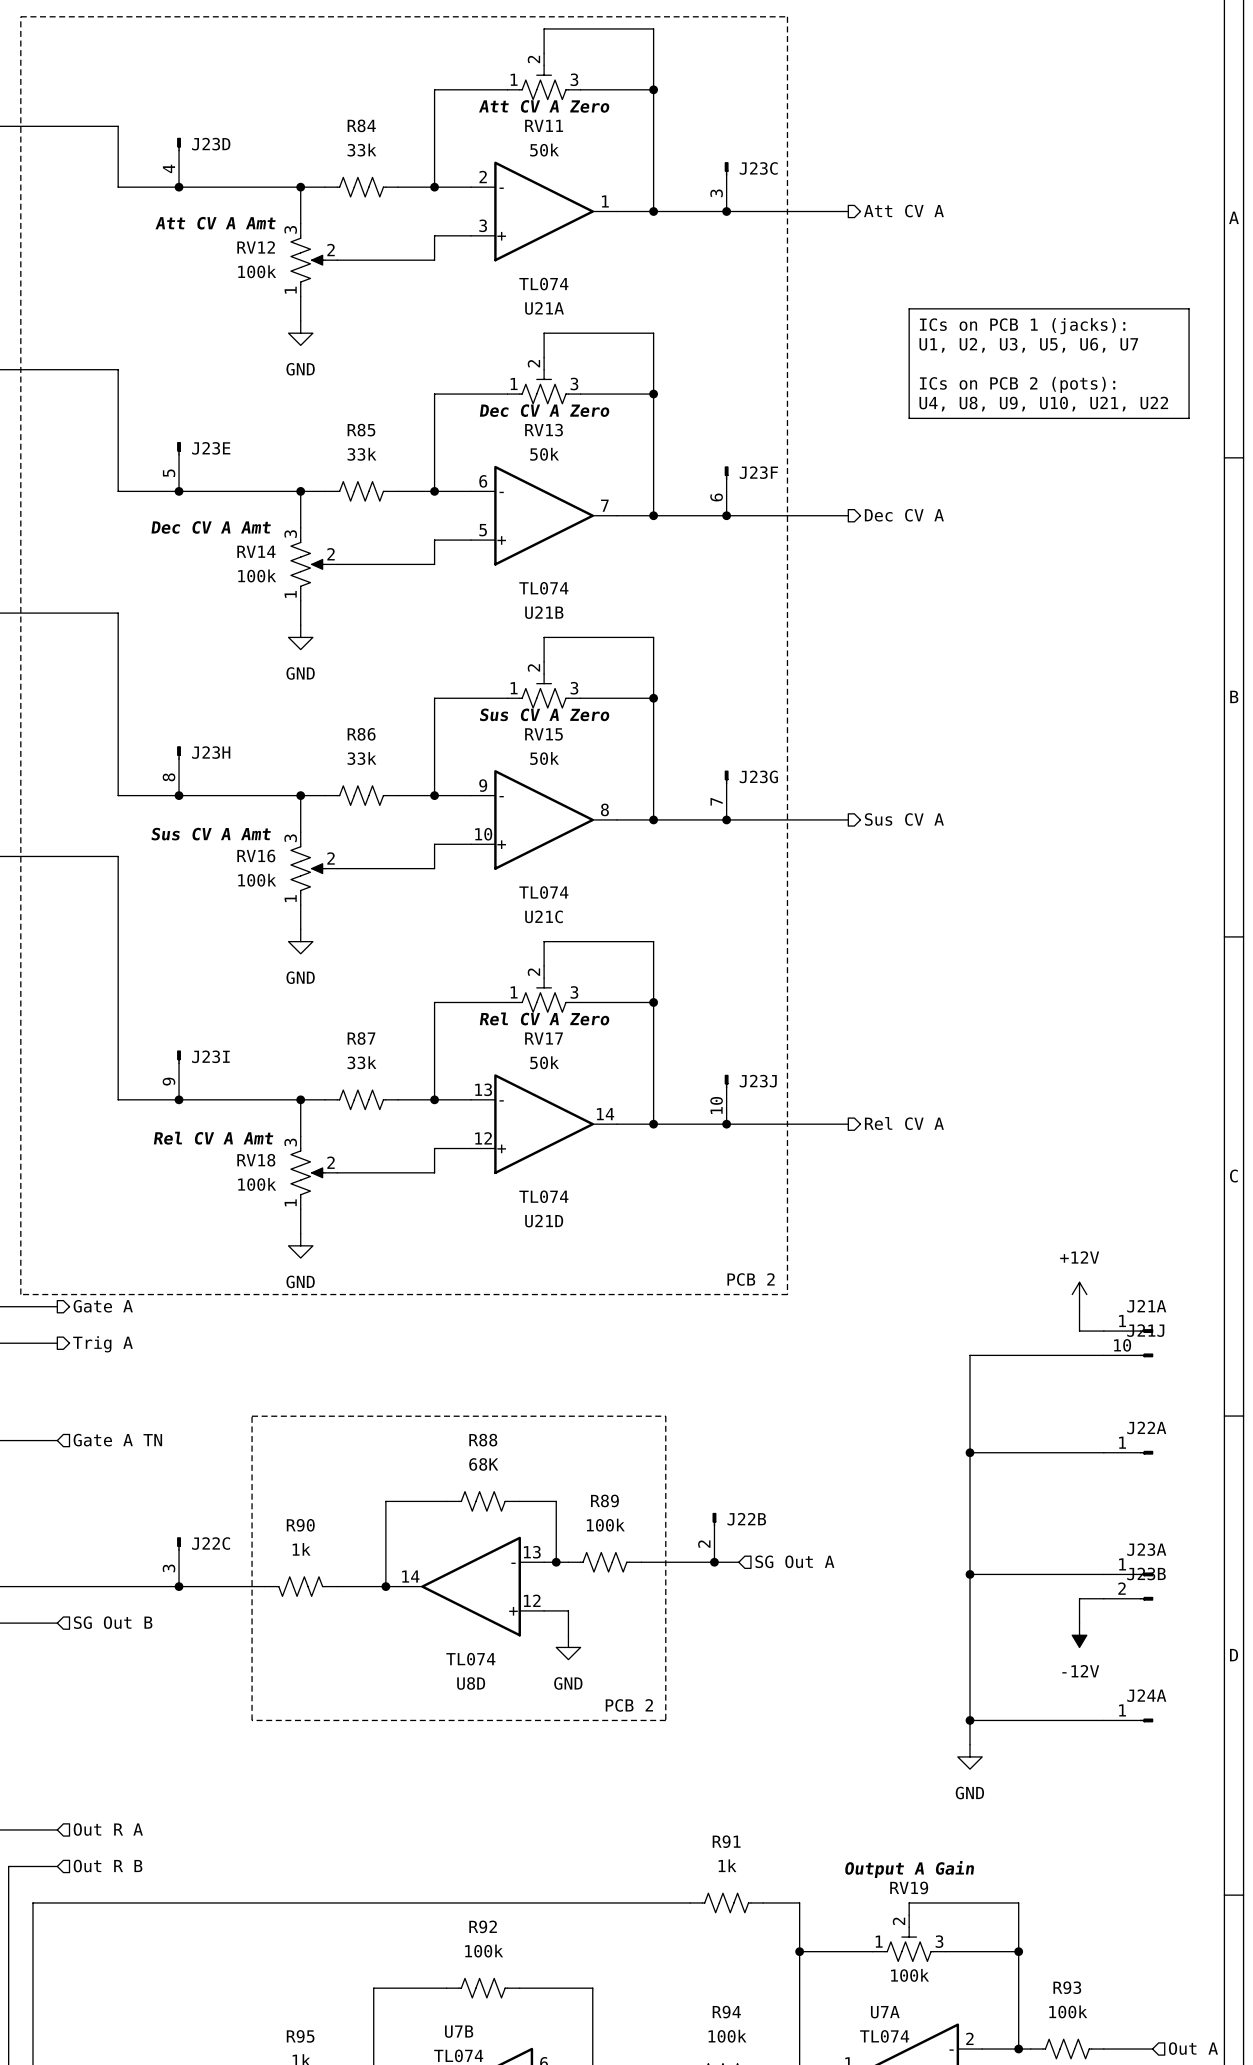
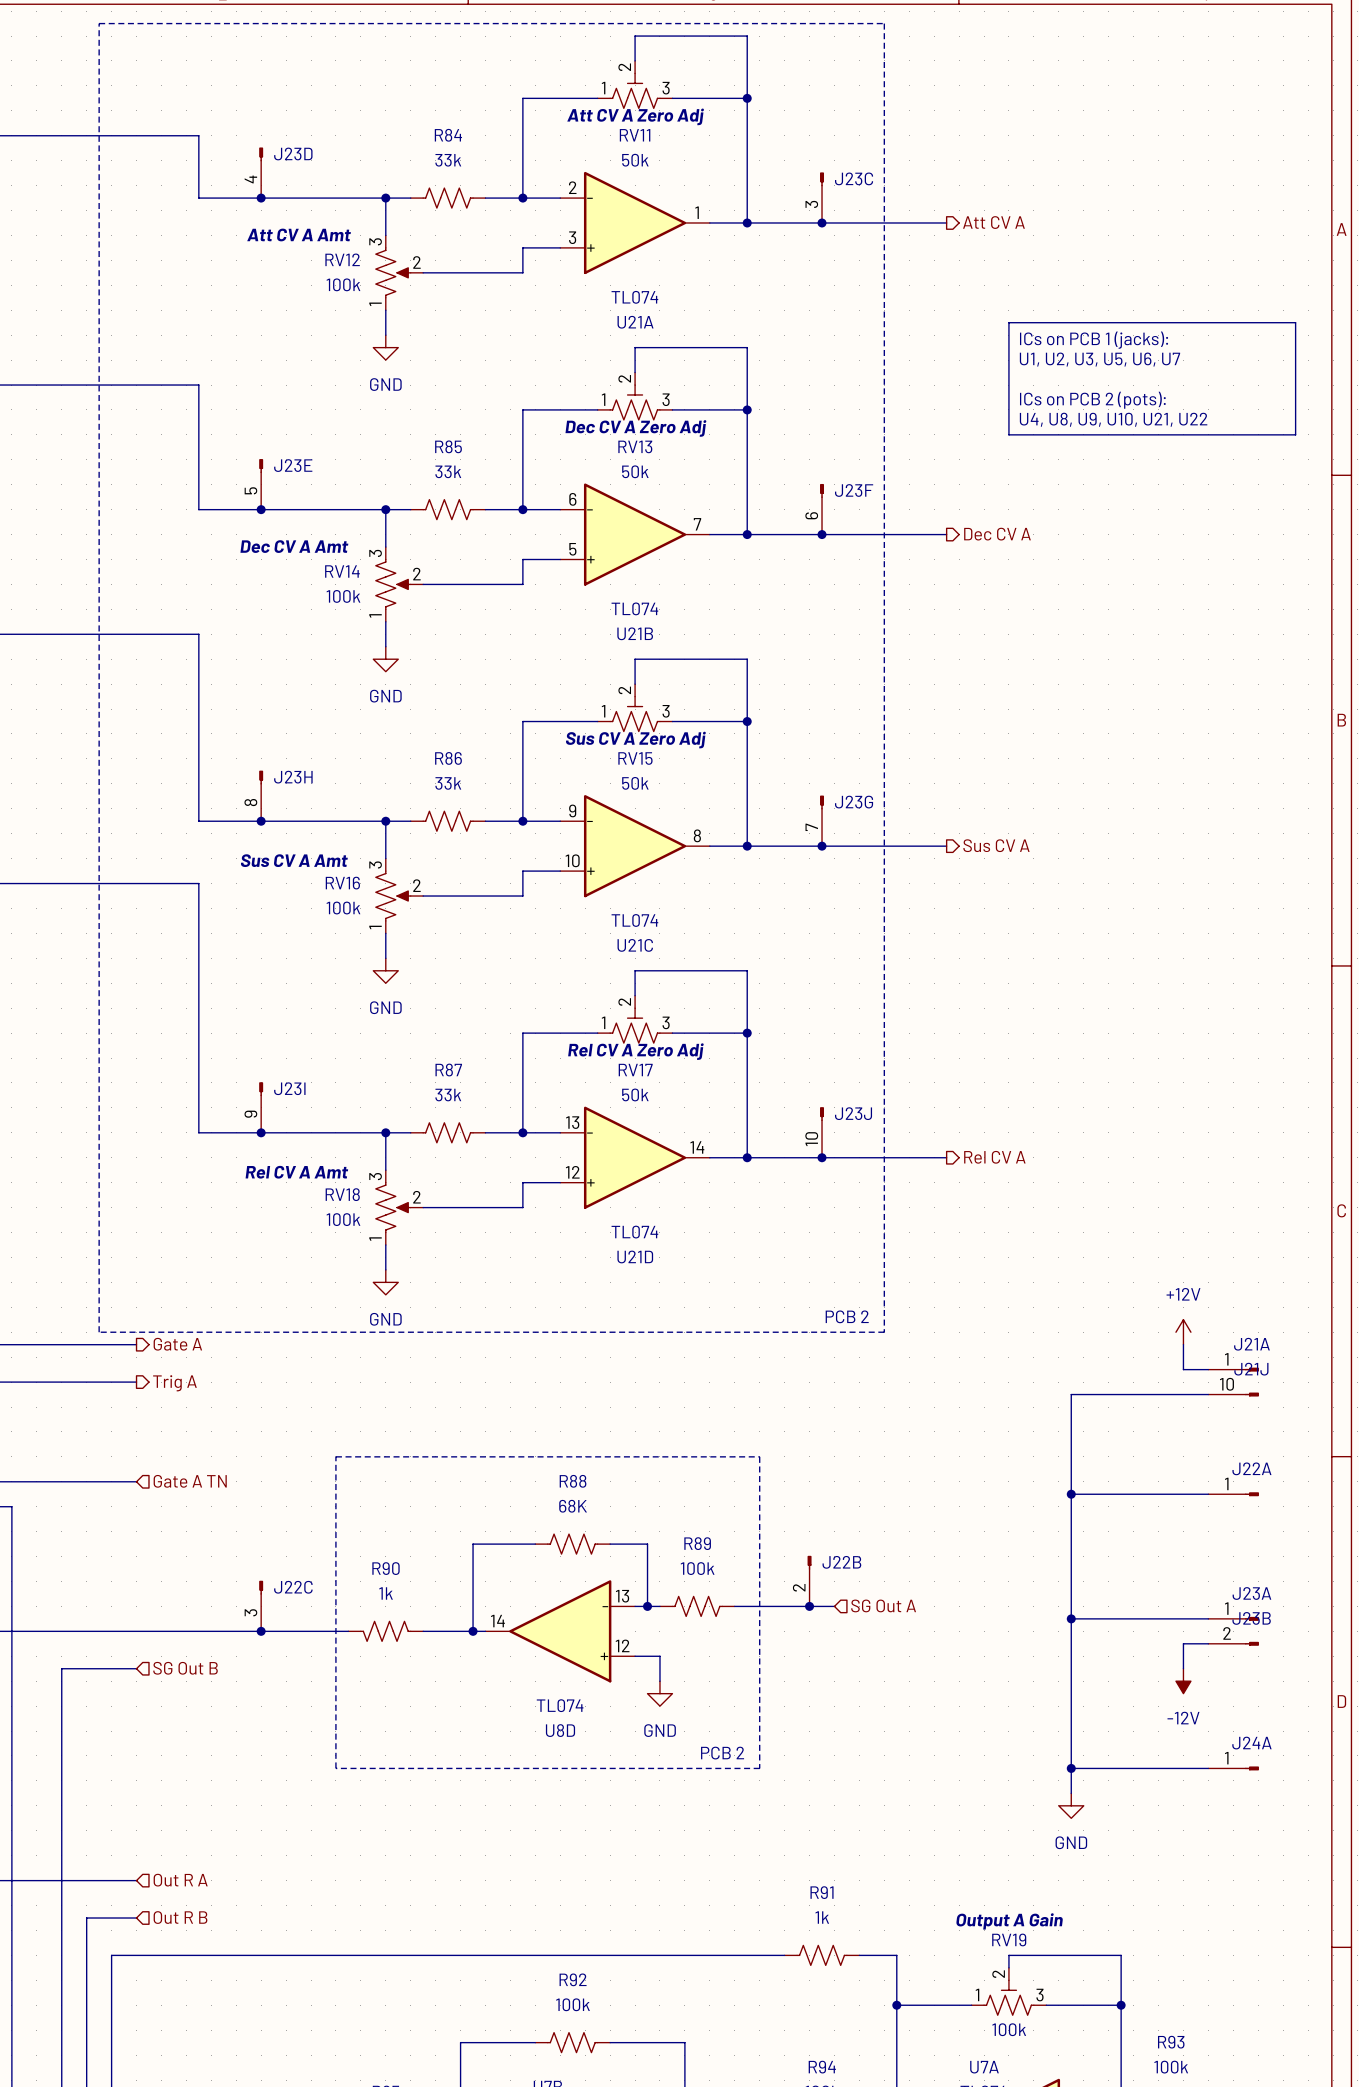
RV11 text: Att CV A Zero (544, 106) -> Att CV A Zero Adj (635, 116)
RV13 text: Dec CV A Zero (544, 410) -> Dec CV A Zero Adj (635, 428)
RV15 text: Sus CV A Zero (544, 714) -> Sus CV A Zero Adj (635, 740)
RV17 text: Rel CV A Zero (544, 1018) -> Rel CV A Zero Adj (635, 1051)

